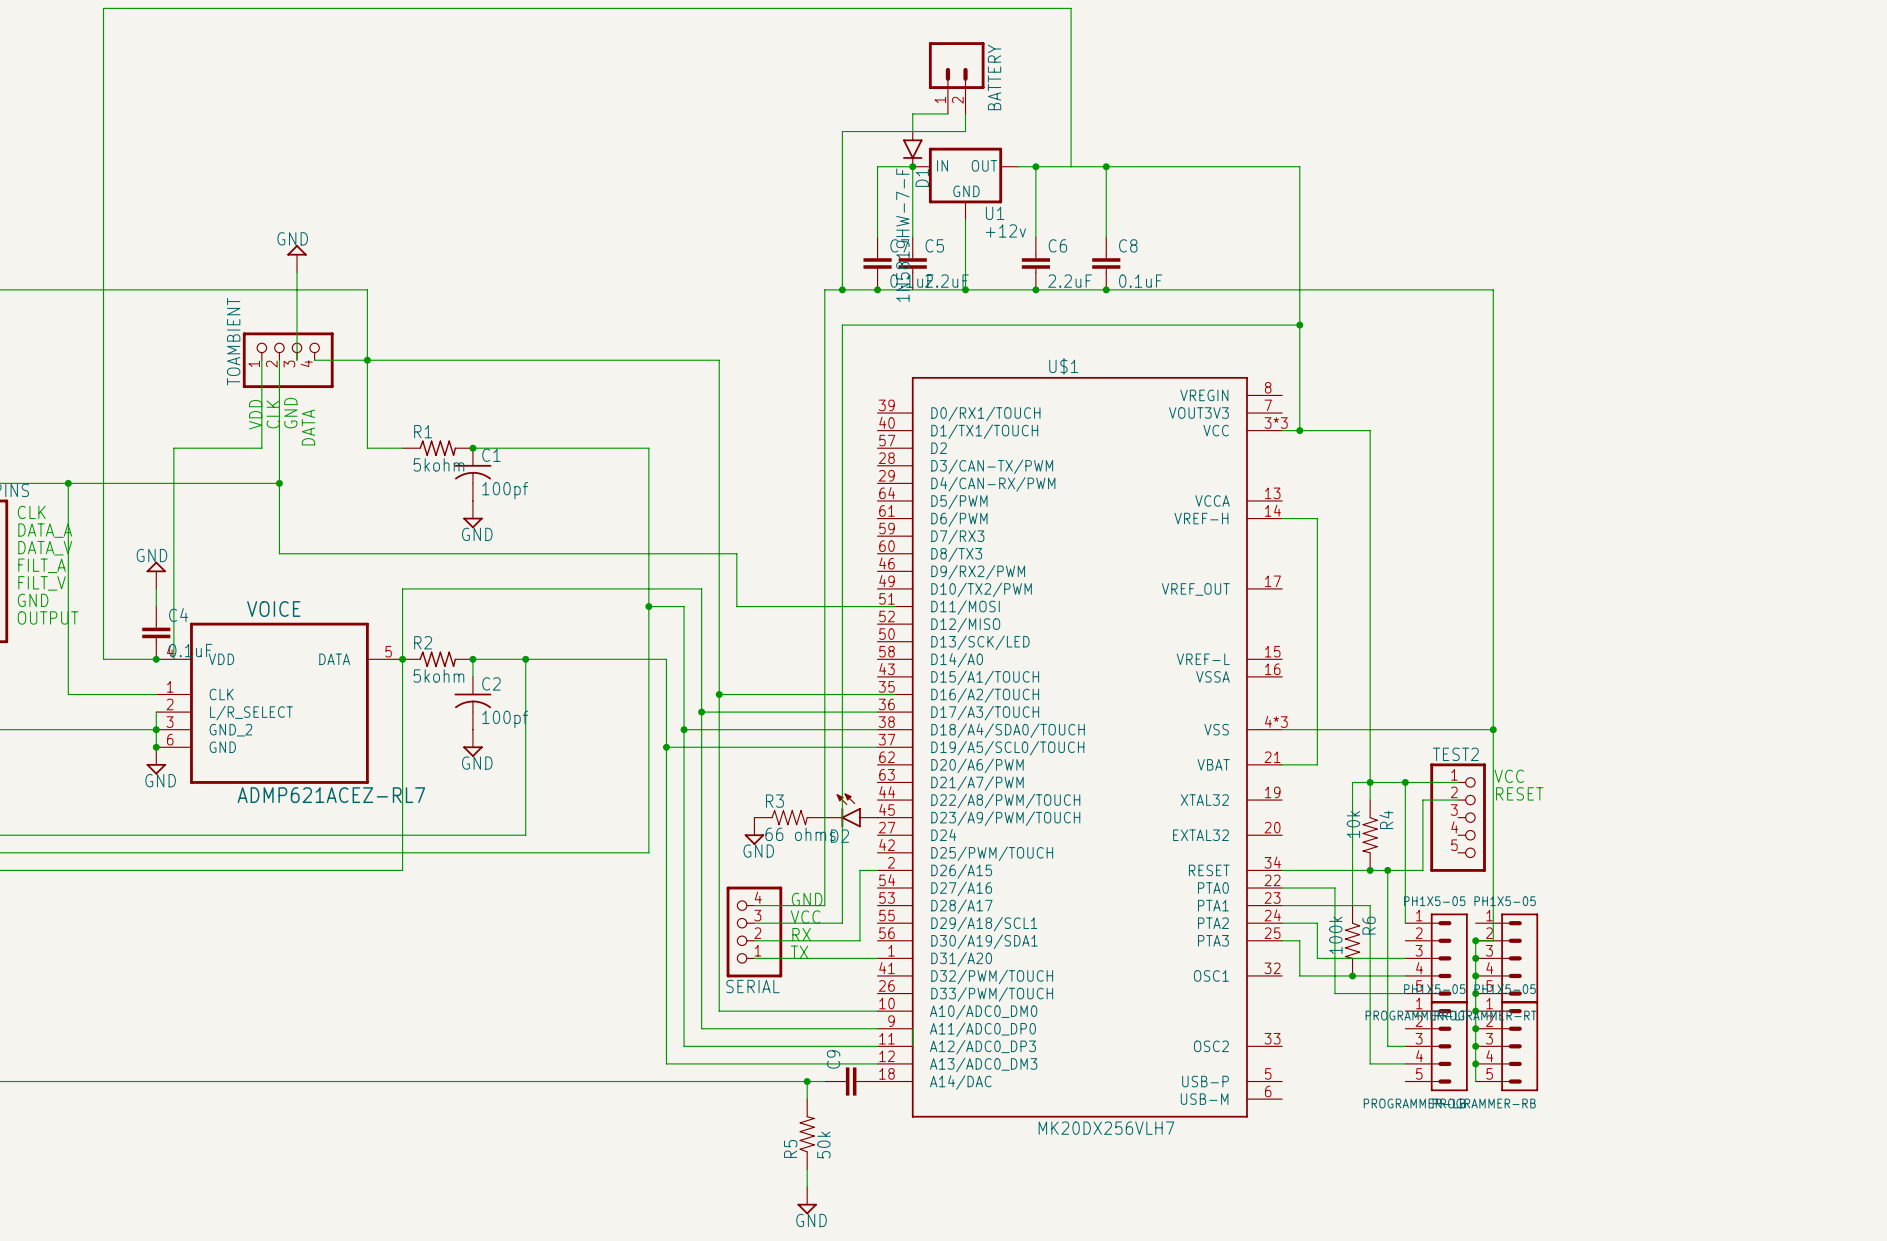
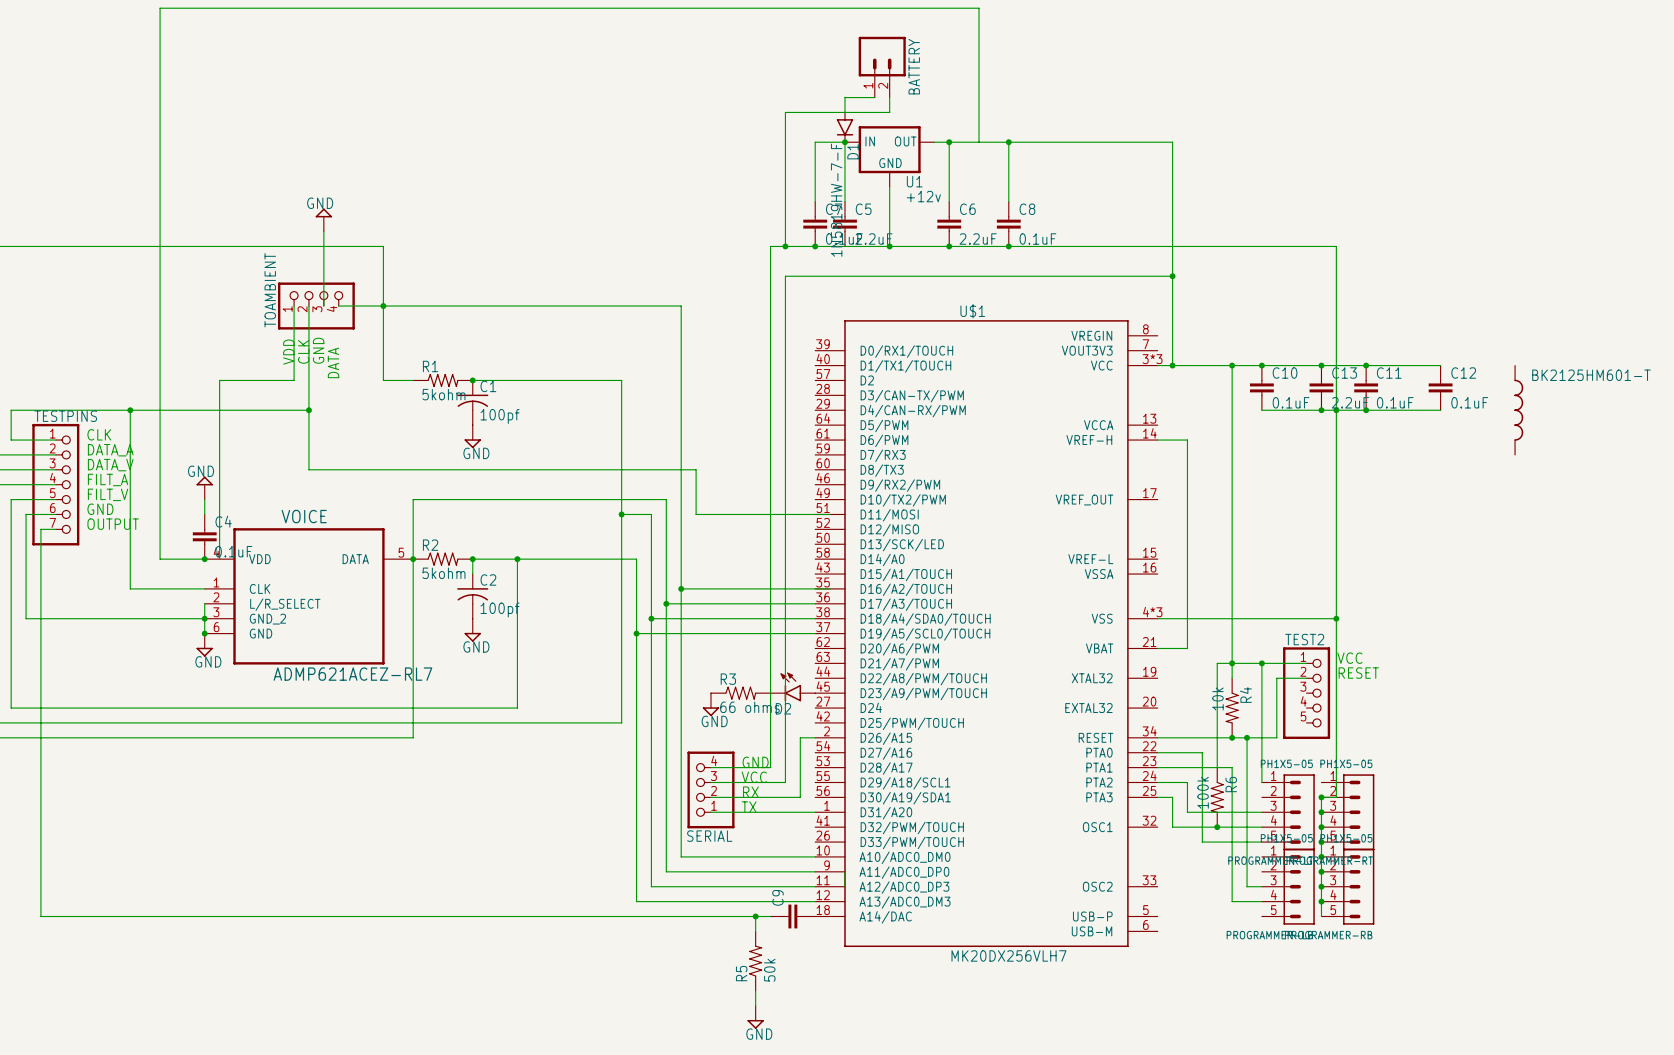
wire: none -> (1232, 365) (1440, 365)
junction: none -> (1232, 365)
junction: none -> (1261, 365)
junction: none -> (1321, 365)
junction: none -> (1366, 365)
C10: none -> 0.1uF (1261, 387)
C13: none -> 2.2uF (1321, 387)
C11: none -> 0.1uF (1366, 387)
C12: none -> 0.1uF (1440, 387)
wire: none -> (1261, 410) (1440, 410)
junction: none -> (1321, 410)
junction: none -> (1336, 410)
junction: none -> (1366, 410)
BK2125HM601-T: none -> (1518, 410)

